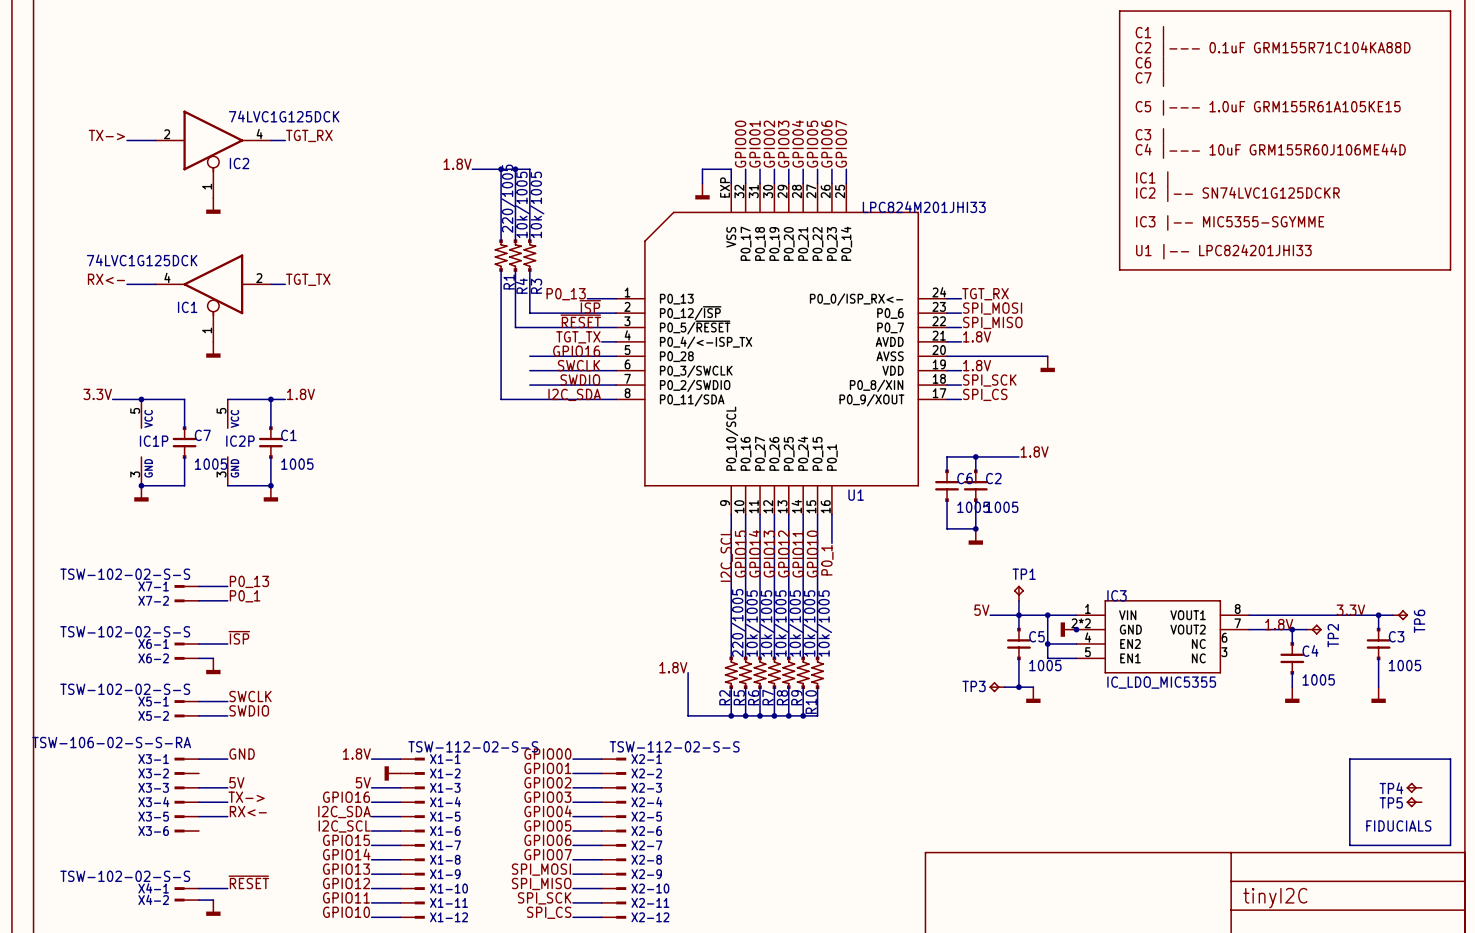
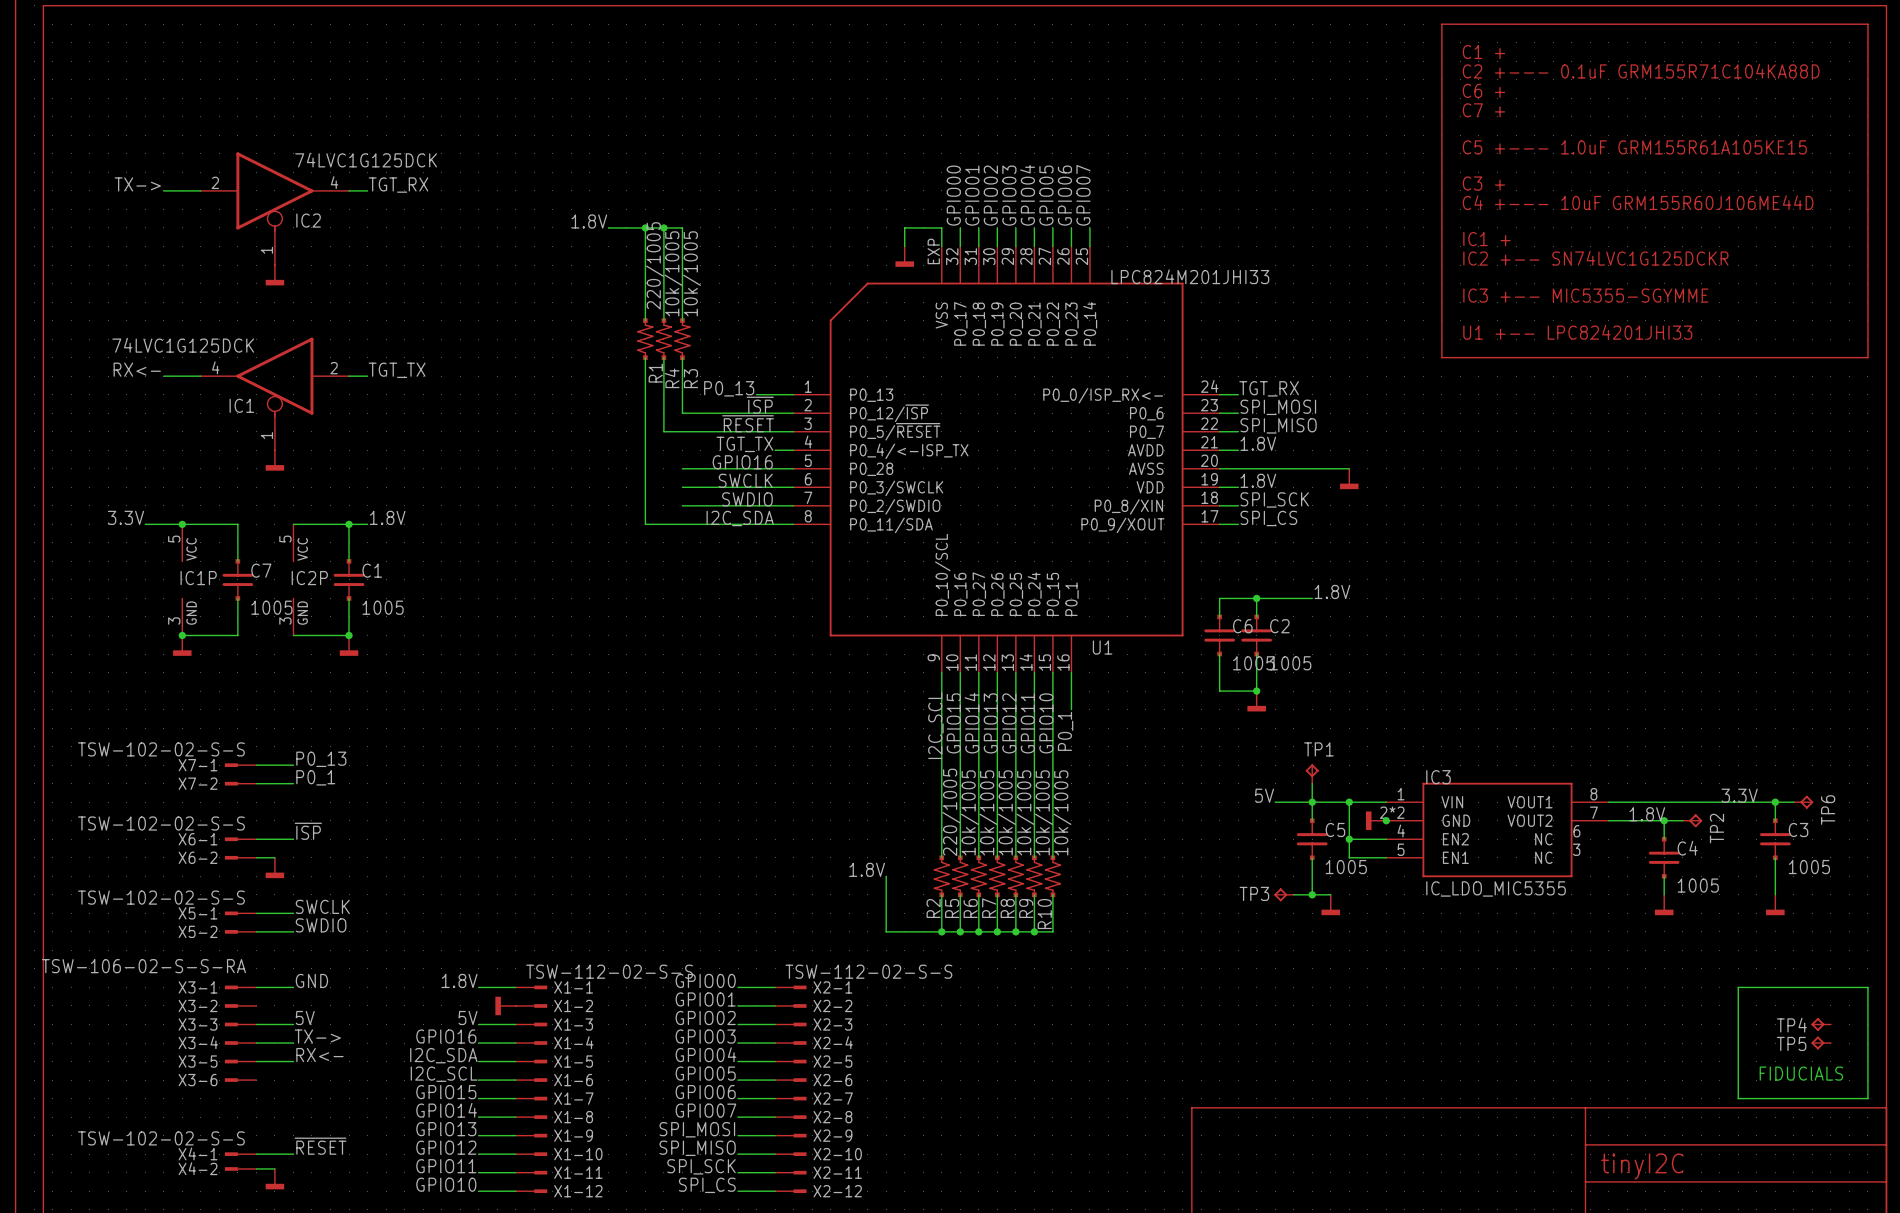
text: C1 | (1149, 33) -> C1 + (1483, 52)
text: C2 |--- 0.1uF GRM155R71C104KA88D (1273, 48) -> C2 +--- 0.1uF GRM155R71C104KA88D (1641, 71)
text: C6 | (1149, 64) -> C6 + (1483, 90)
text: C7 | (1149, 79) -> C7 + (1483, 110)
text: C5 |--- 1.0uF GRM155R61A105KE15 (1268, 107) -> C5 +--- 1.0uF GRM155R61A105KE15 (1634, 147)
text: C3 | (1149, 135) -> C3 + (1483, 183)
text: C4 |--- 10uF GRM155R60J106ME44D (1270, 151) -> C4 +--- 10uF GRM155R60J106ME44D (1638, 202)
text: IC1 | (1152, 179) -> IC1 + (1486, 239)
text: IC2 |-- SN74LVC1G125DCKR (1237, 194) -> IC2 +-- SN74LVC1G125DCKR (1595, 258)
text: IC3 |-- MIC5355-SGYMME (1230, 222) -> IC3 +-- MIC5355-SGYMME (1585, 295)
text: U1 |-- LPC824201JHI33 (1223, 251) -> U1 +-- LPC824201JHI33 (1577, 332)

